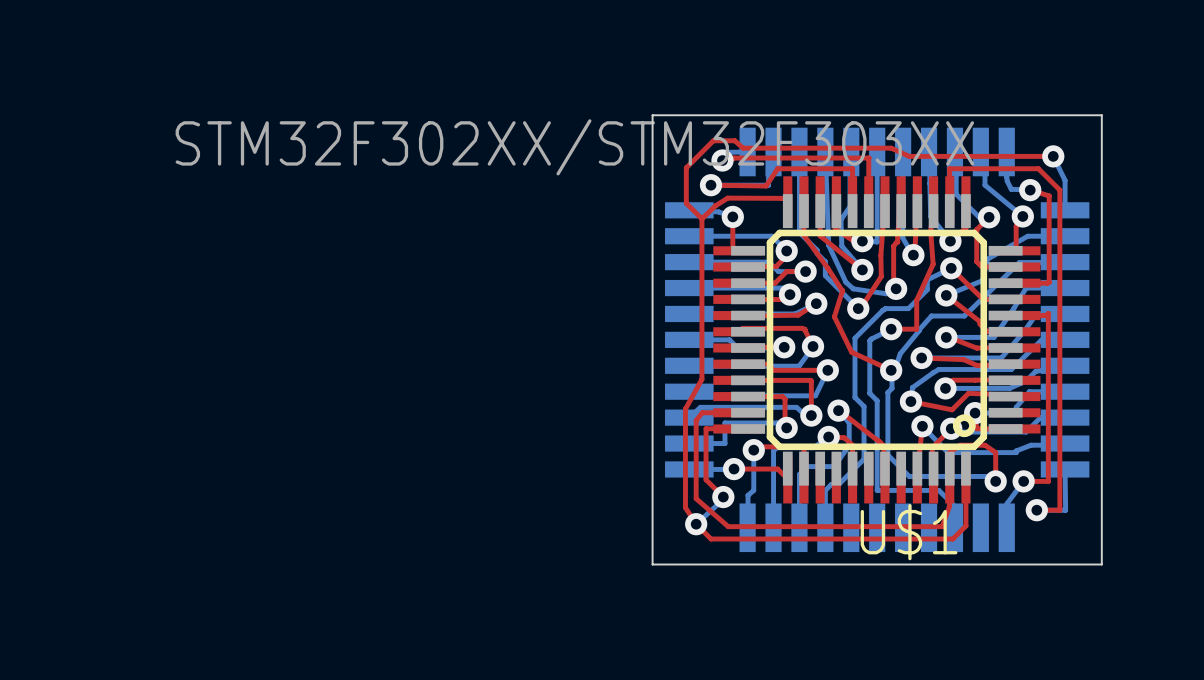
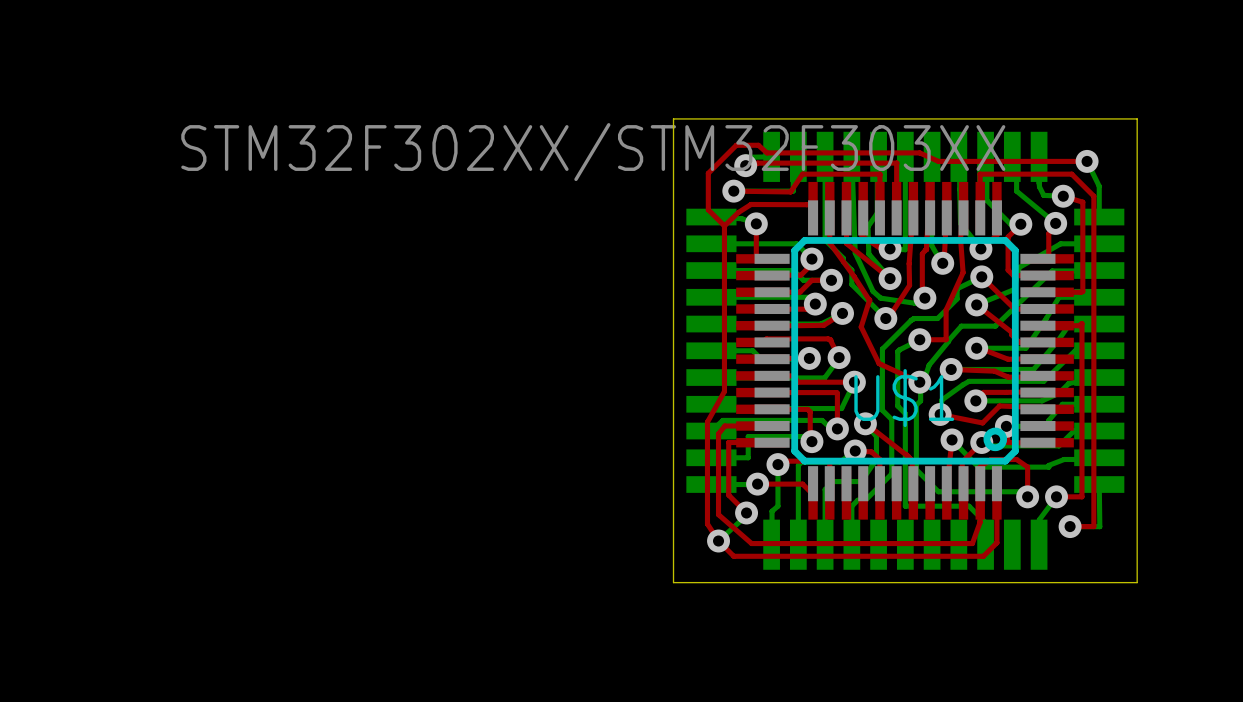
U$1 name position: U$1 (909, 532) -> U$1 (904, 398)

